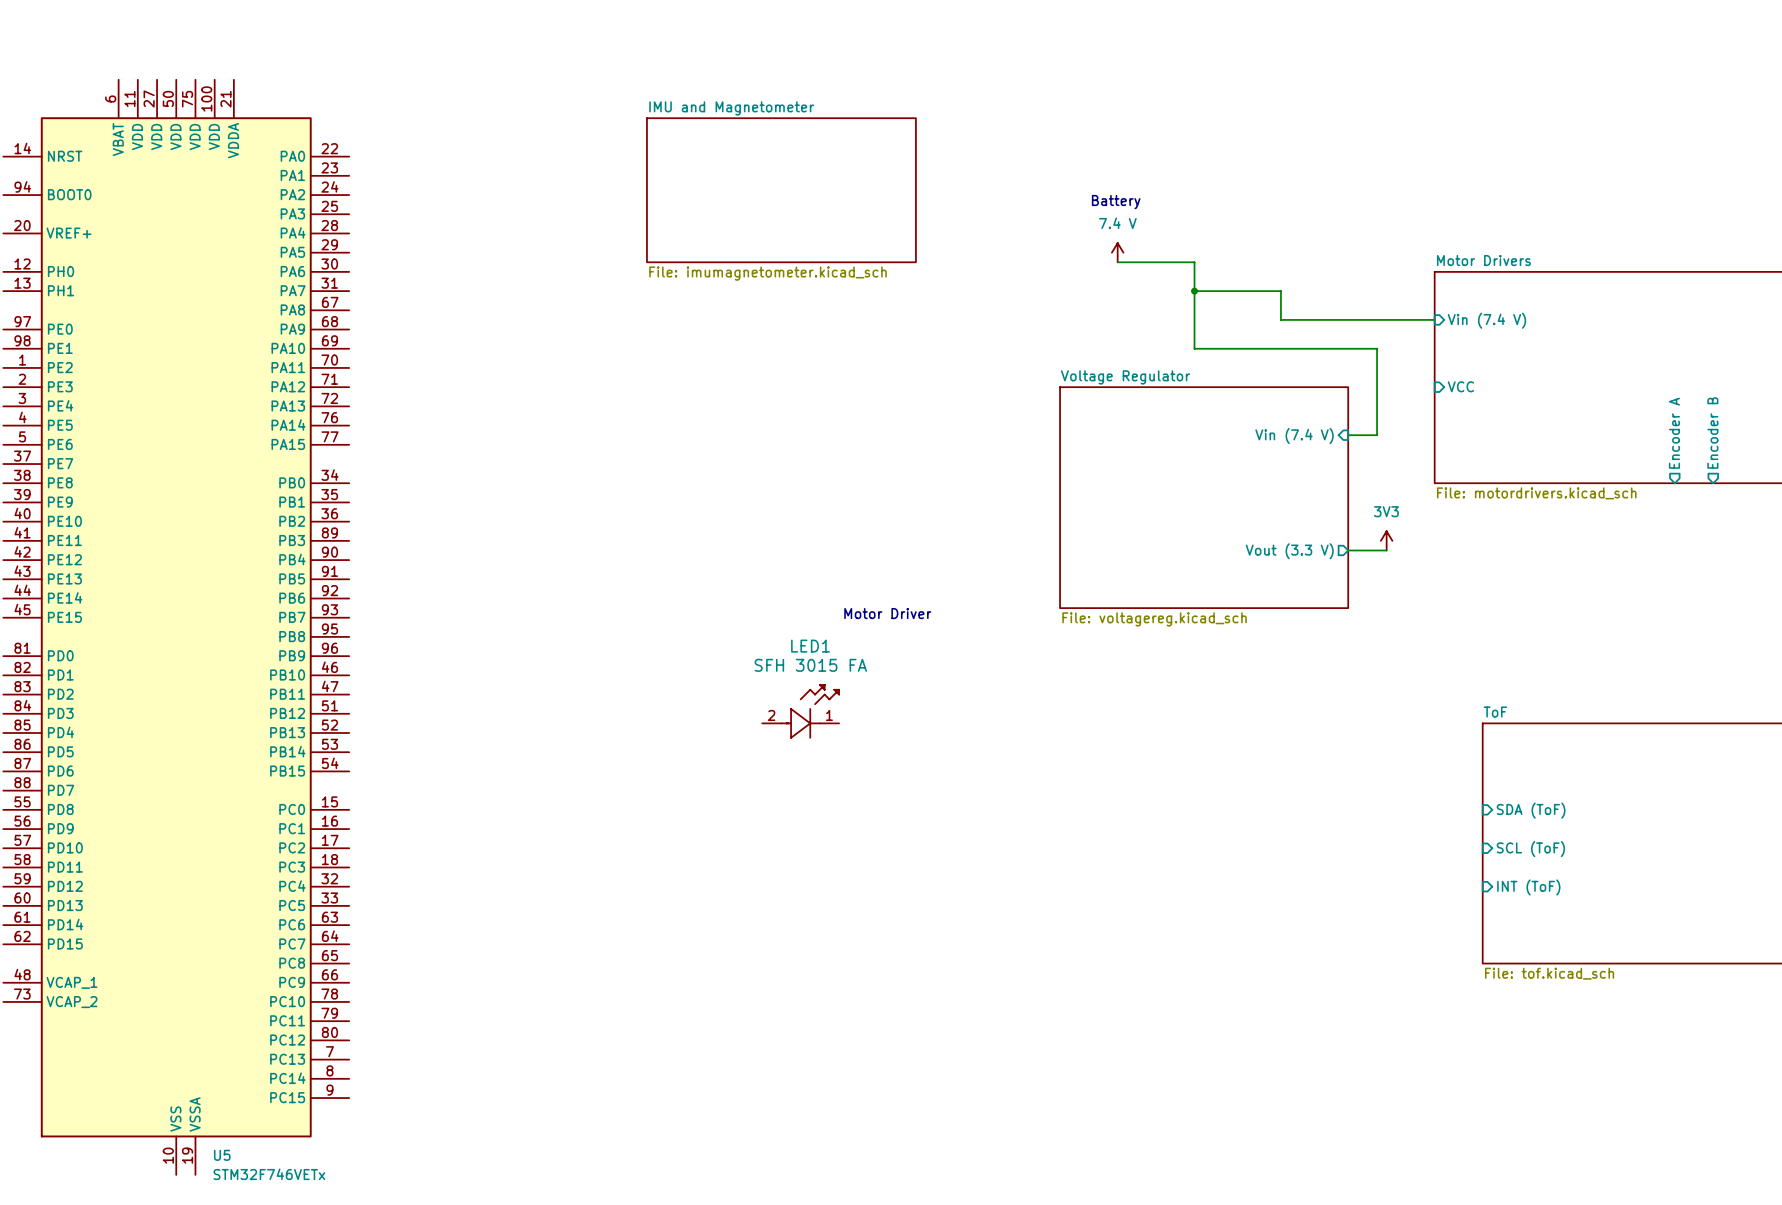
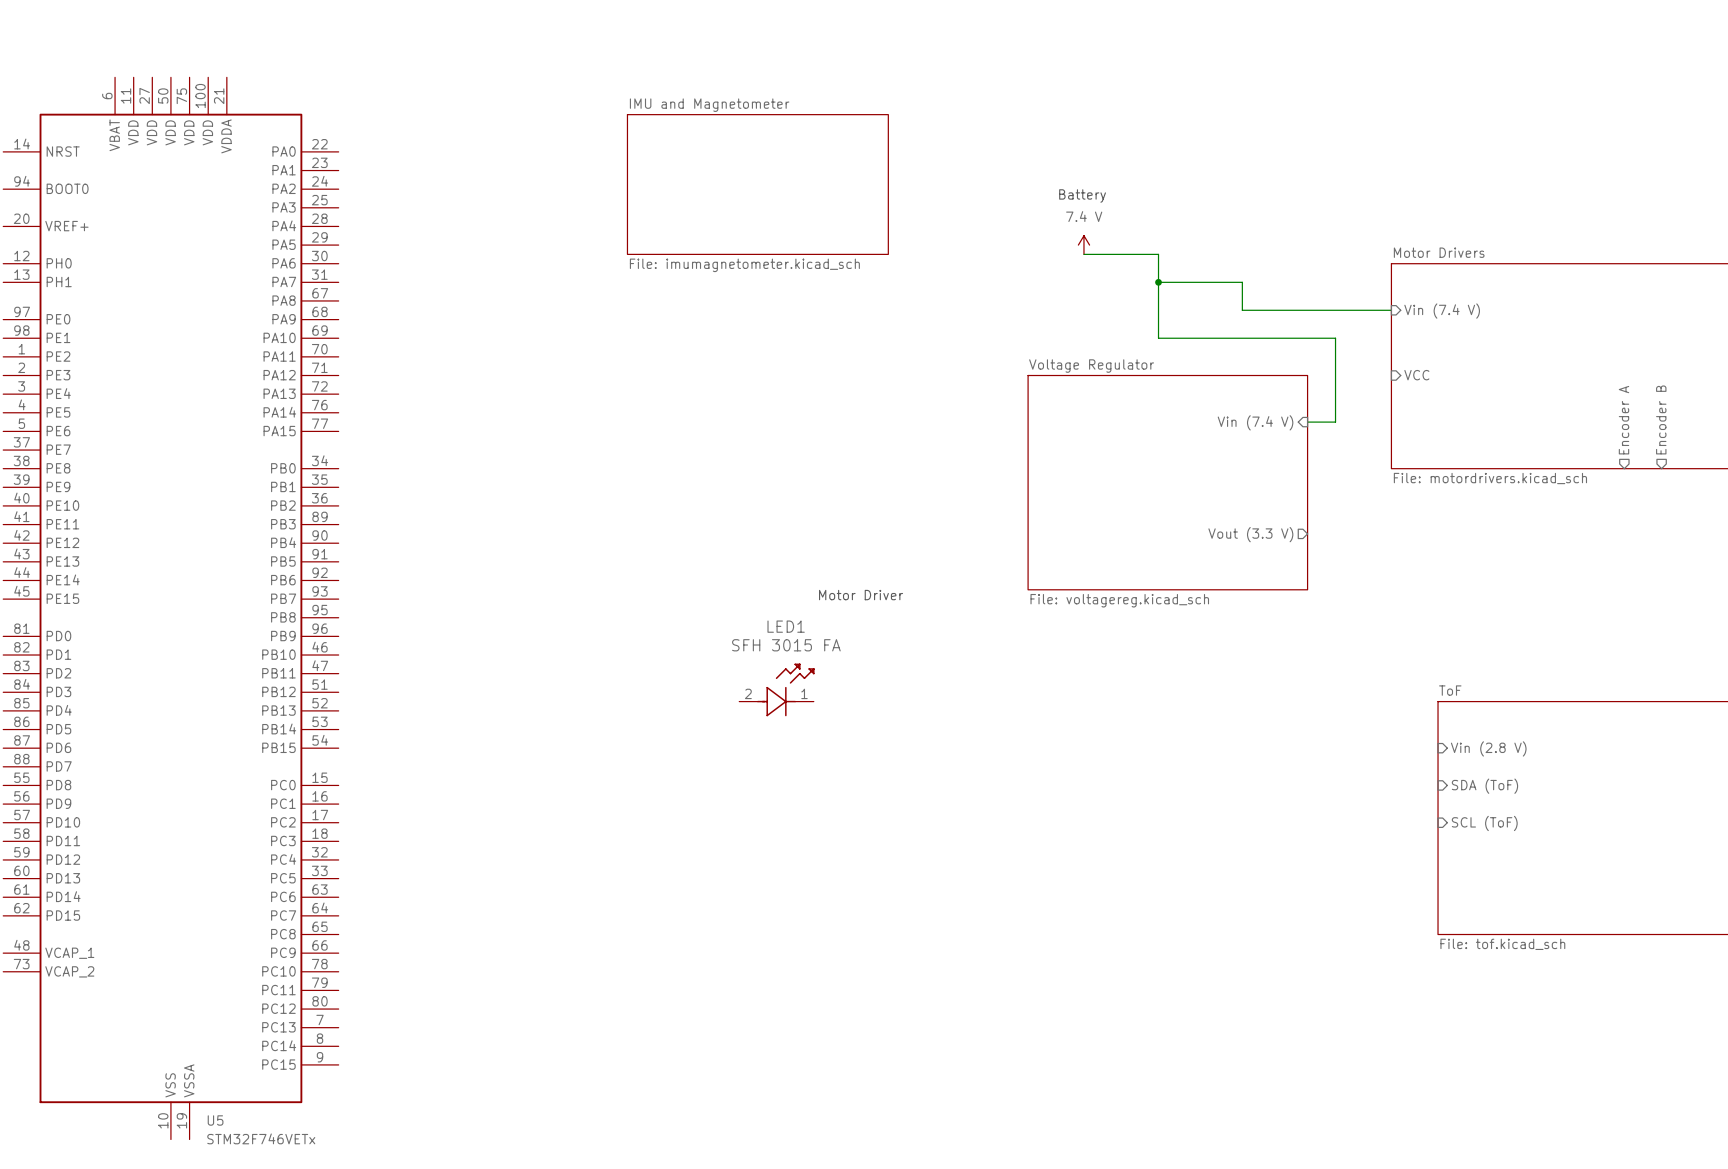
power symbol: 3V3 (1386, 540) -> none
wire: (1348, 550) (1386, 550) -> none
sheet pin: none -> Vin (2.8 V) (1488, 748)
sheet pin: INT (ToF) (1528, 887) -> none

